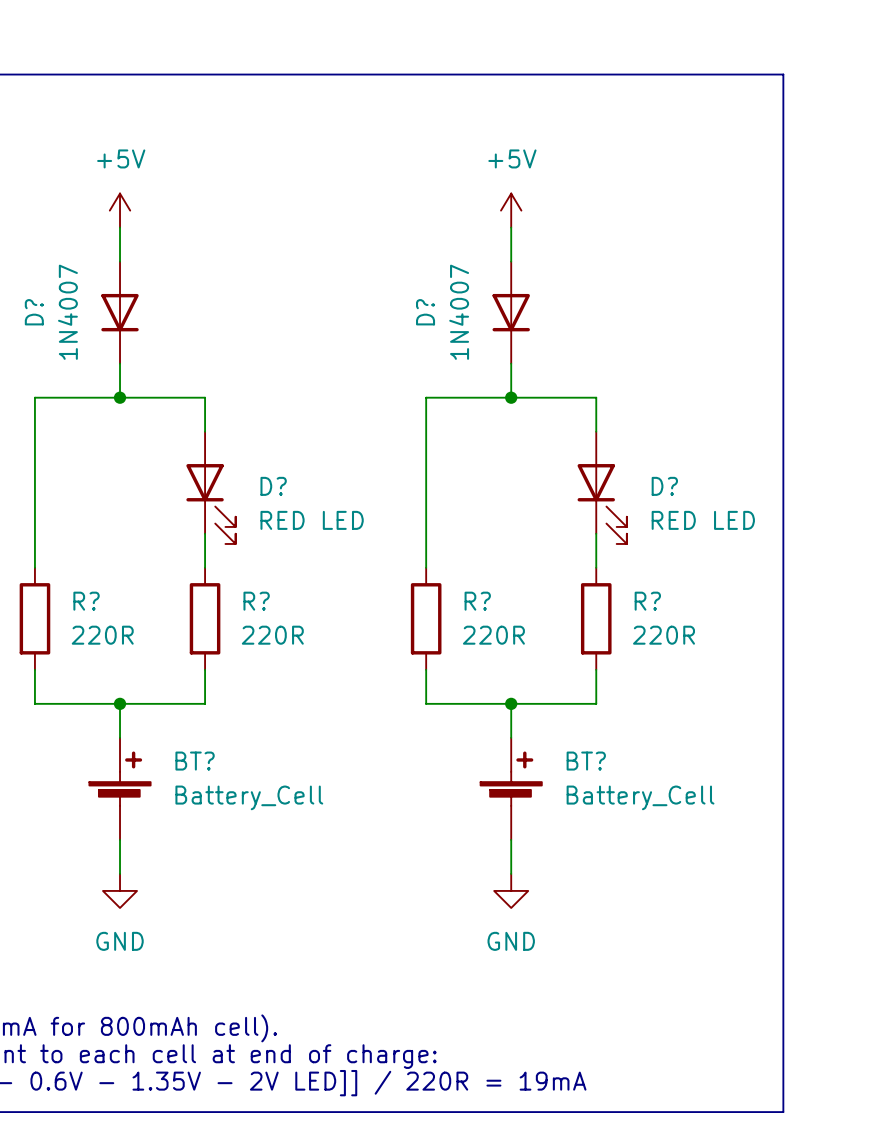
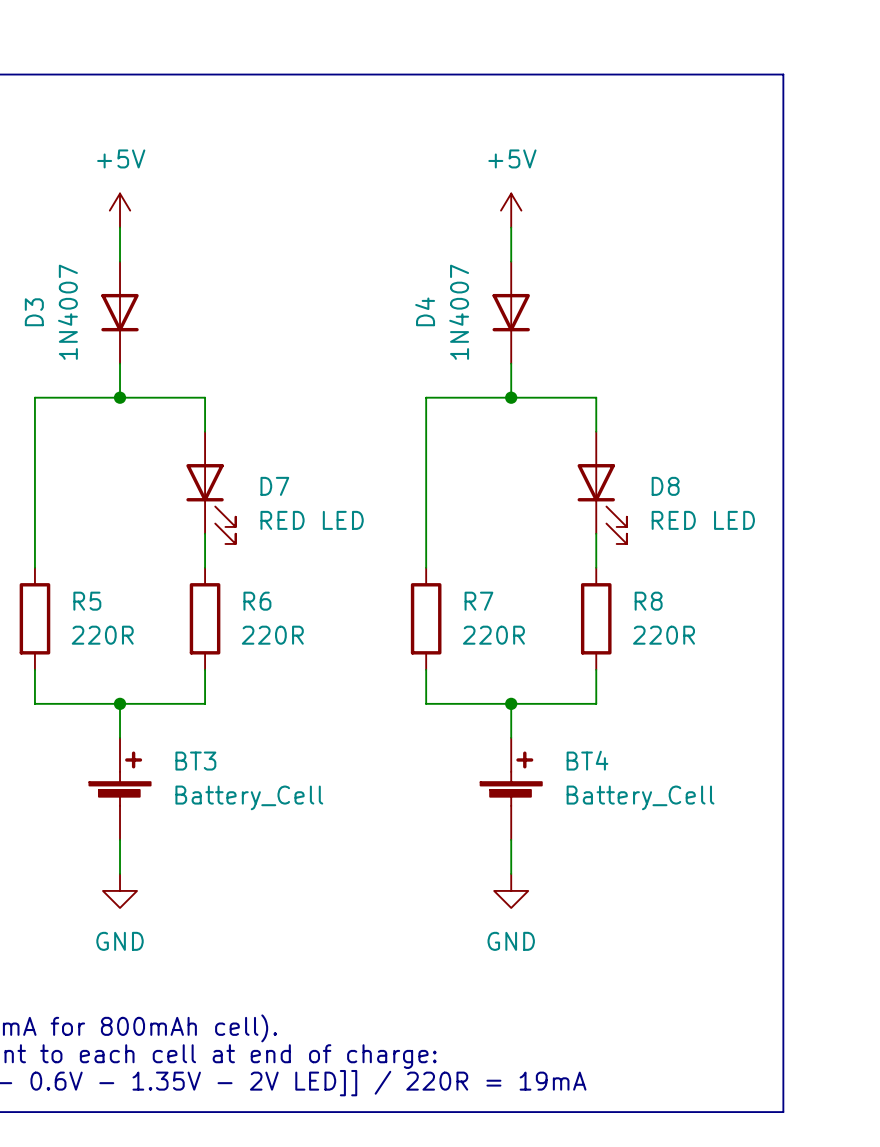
D? name: D? (34, 312) -> D3 (34, 312)
D? name: D? (425, 312) -> D4 (425, 311)
D? name: D? (273, 486) -> D7 (274, 486)
D? name: D? (664, 486) -> D8 (665, 486)
R? name: R? (86, 601) -> R5 (87, 601)
R? name: R? (256, 601) -> R6 (257, 601)
R? name: R? (477, 601) -> R7 (478, 601)
R? name: R? (647, 601) -> R8 (648, 601)
BT? name: BT? (195, 761) -> BT3 (195, 761)
BT? name: BT? (586, 761) -> BT4 (587, 760)

